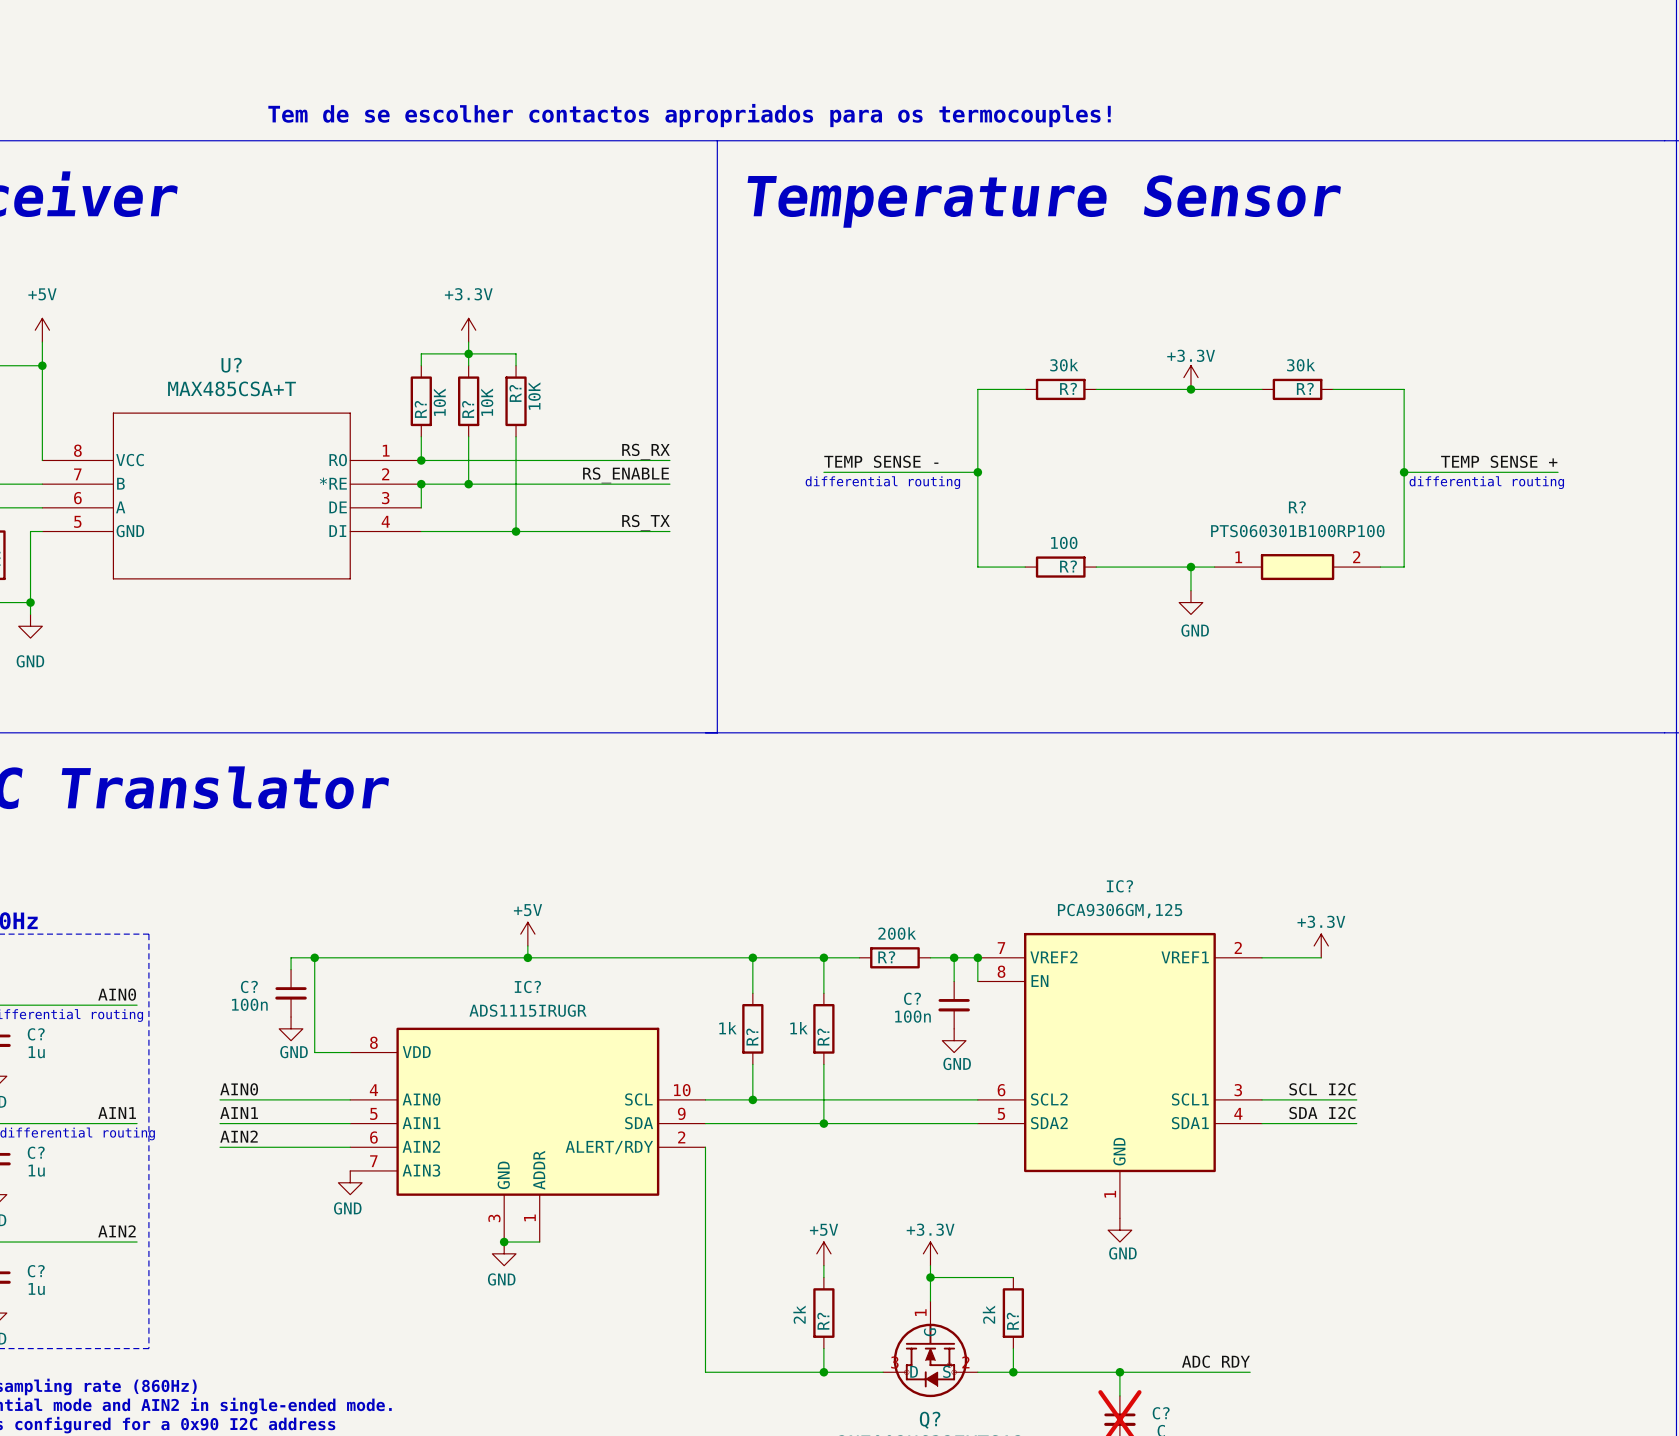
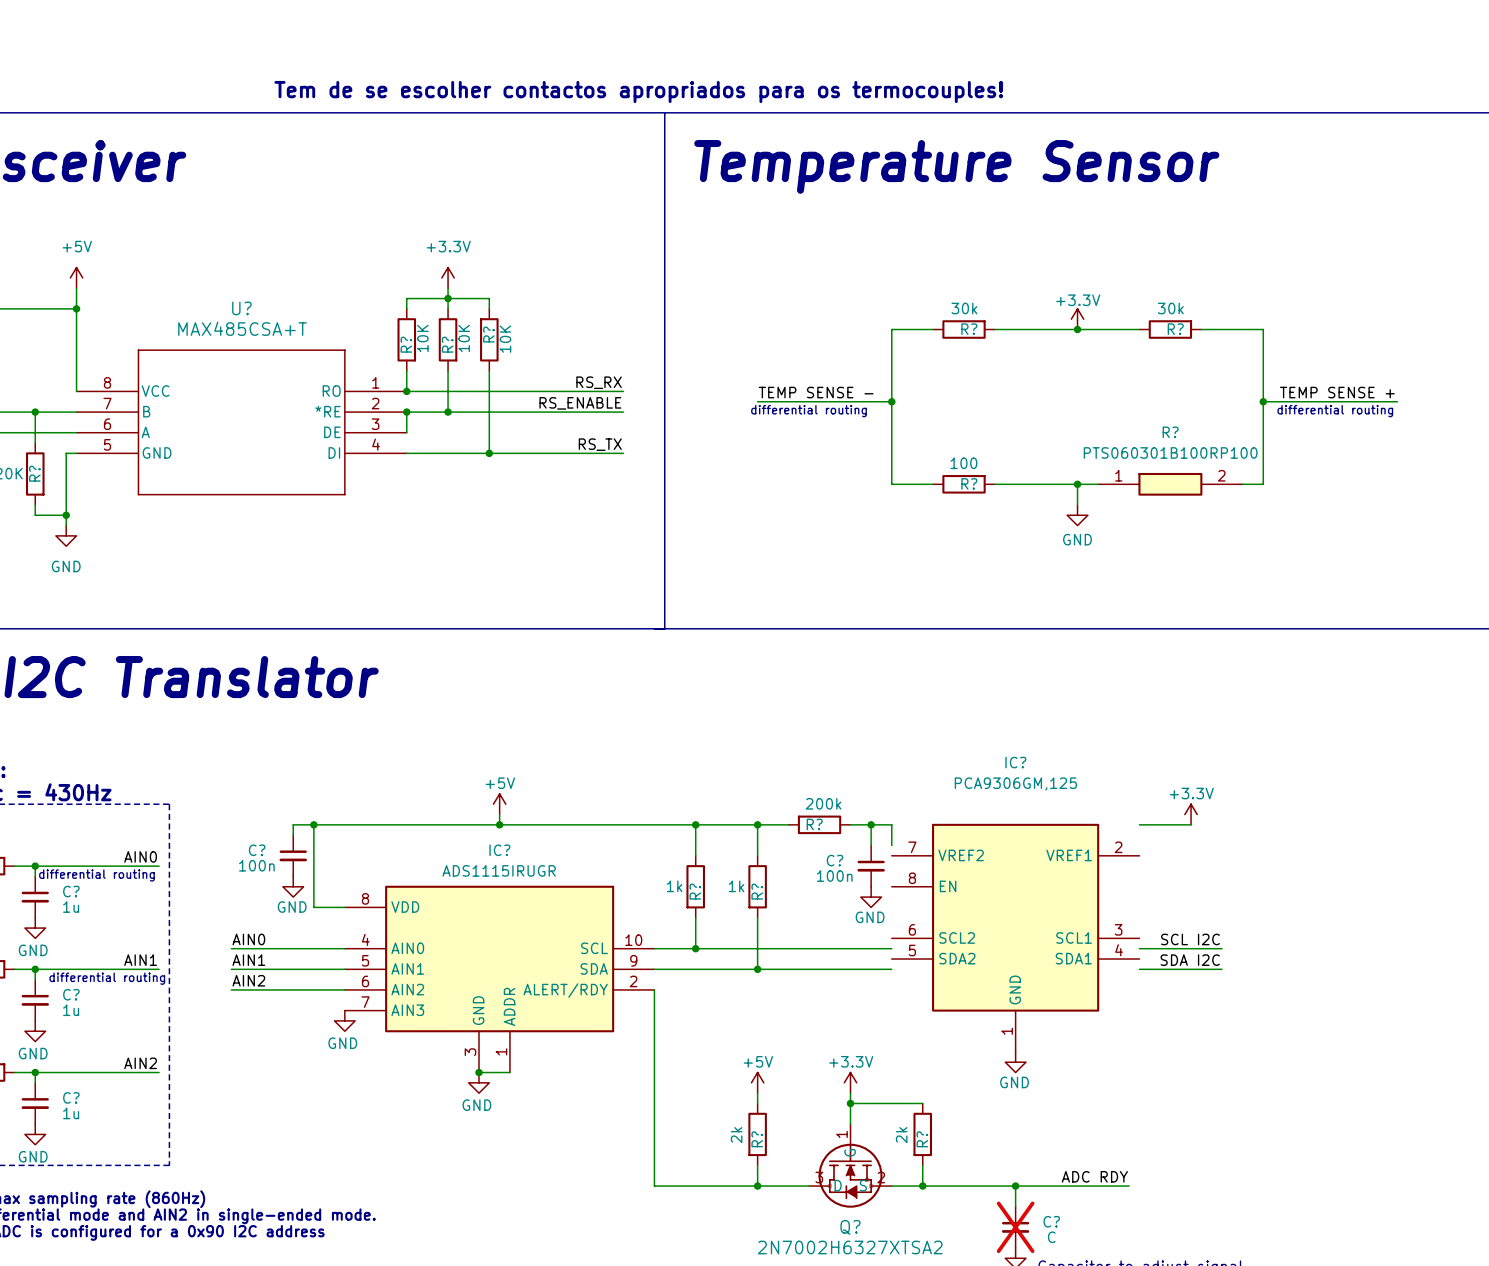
junction: (977, 957) -> none
IC?: PCA9306GM,125 (1119, 1075) -> none
IC?: none -> PCA9306GM,125 (1015, 937)

